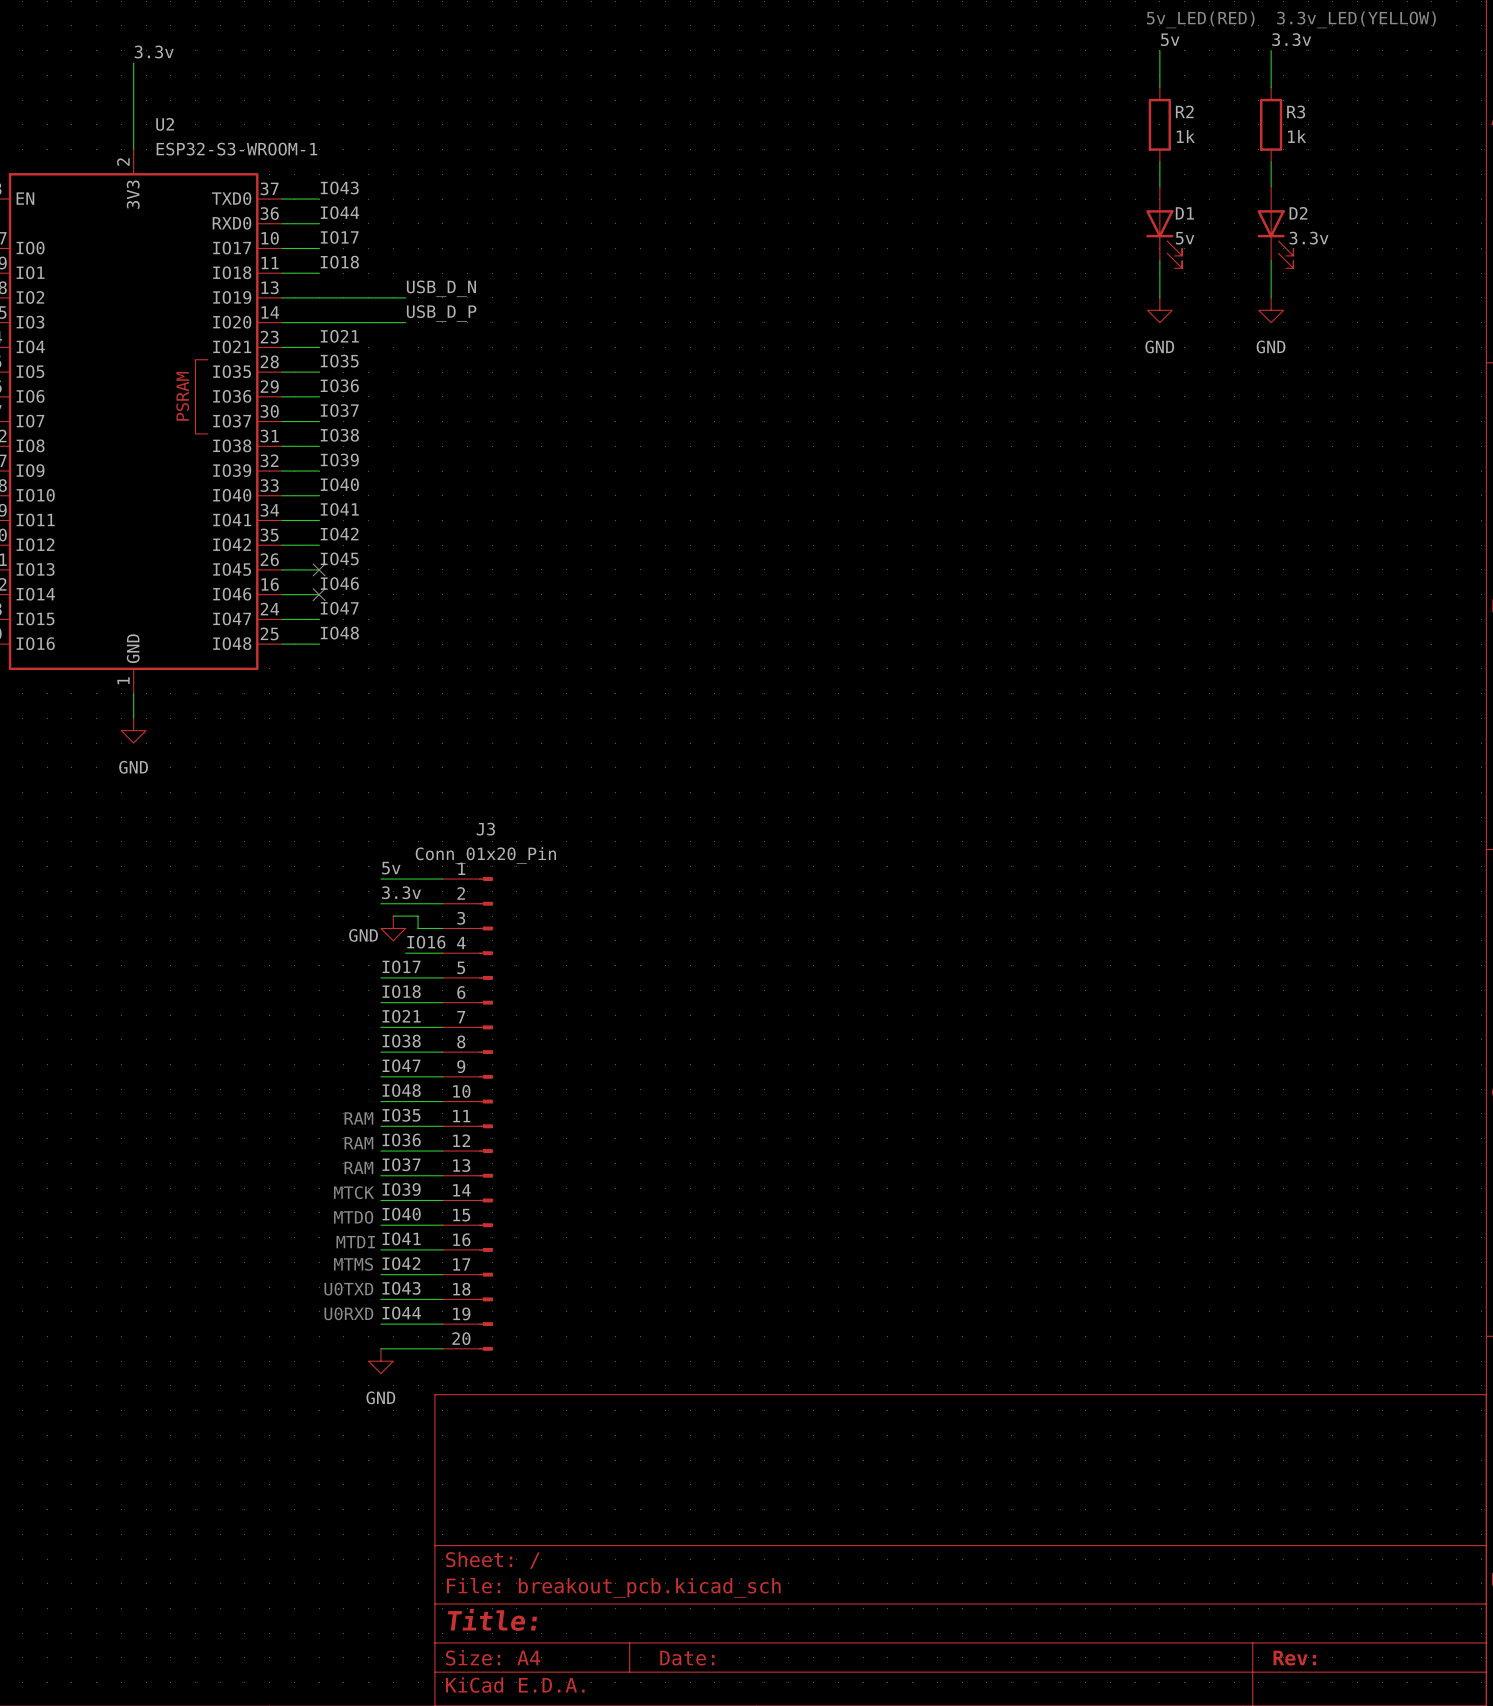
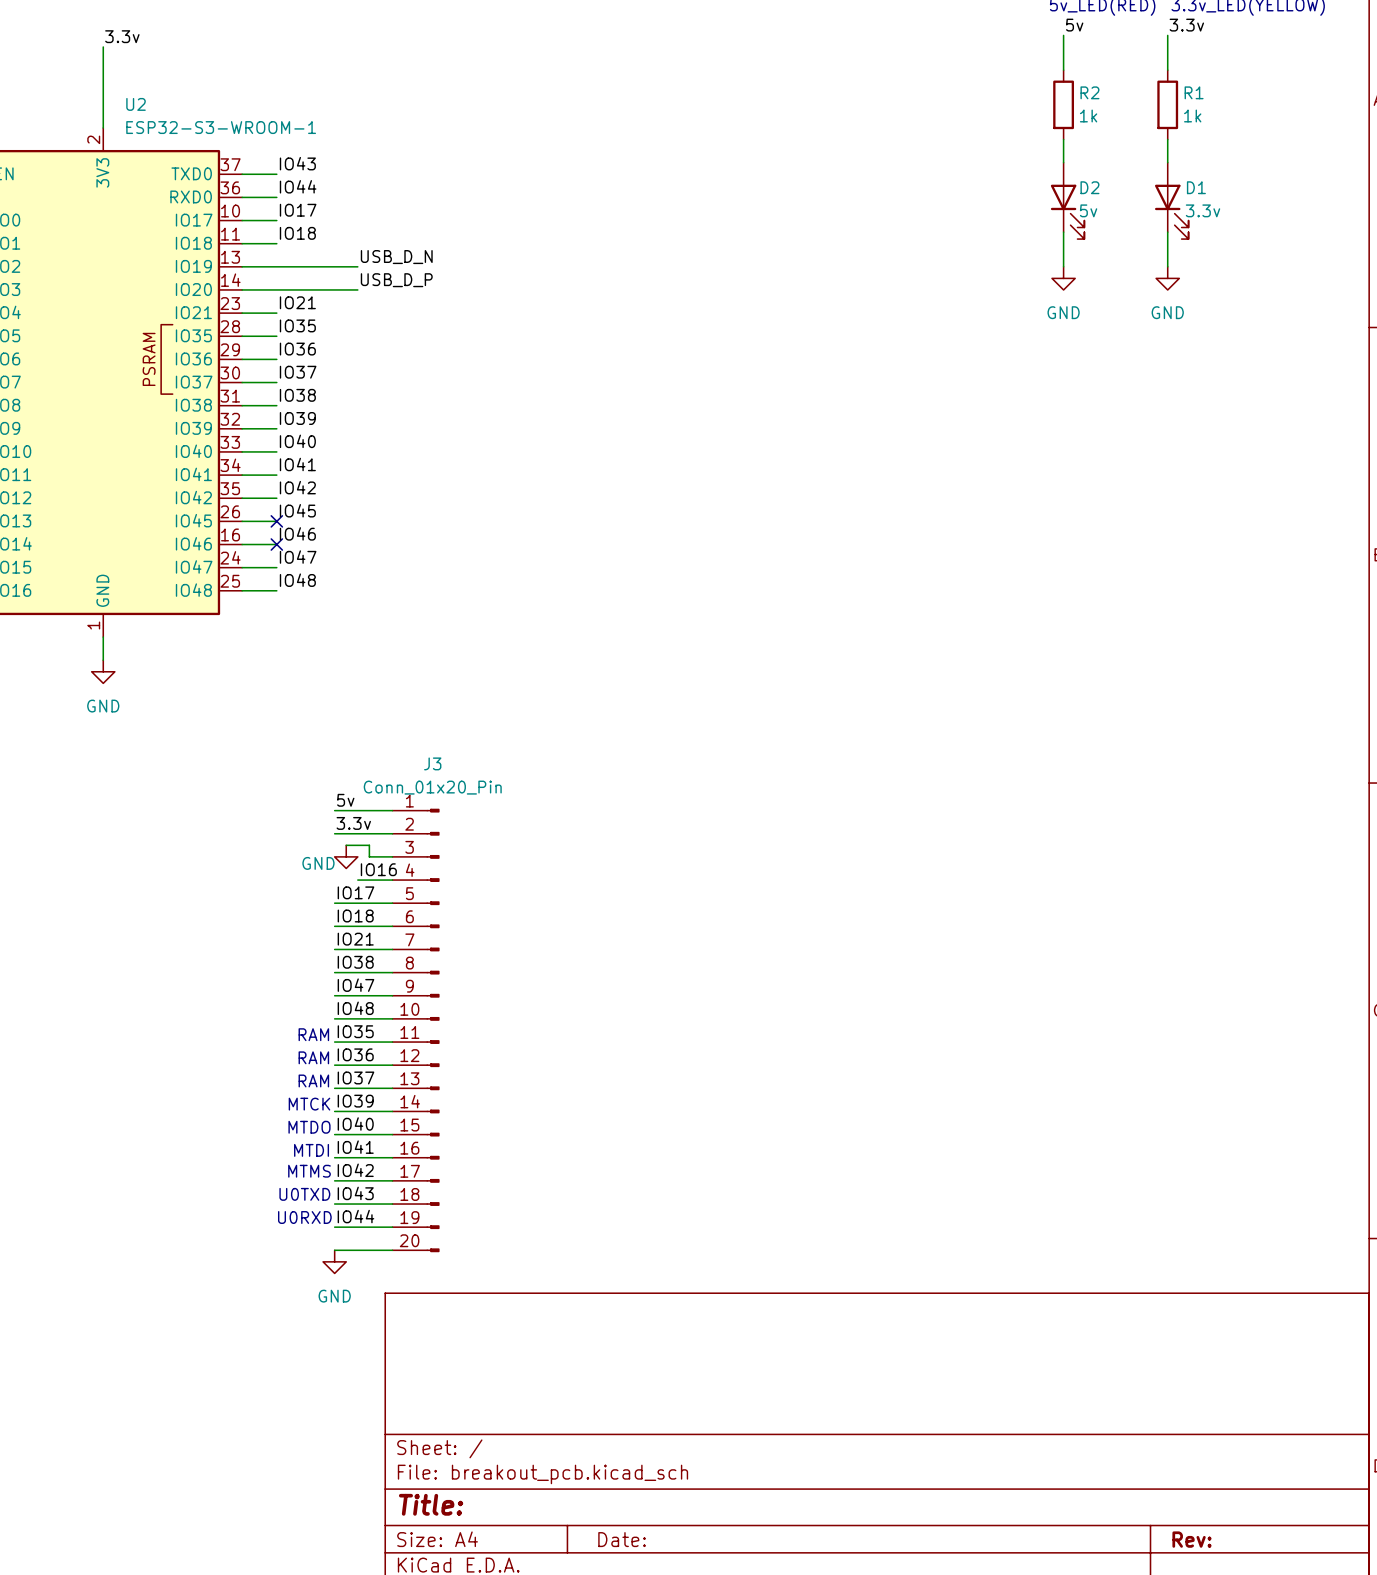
R3 name: R3 (1296, 112) -> R1 (1194, 92)
D1 name: D1 (1184, 213) -> D2 (1089, 187)
D2 name: D2 (1298, 213) -> D1 (1196, 187)

